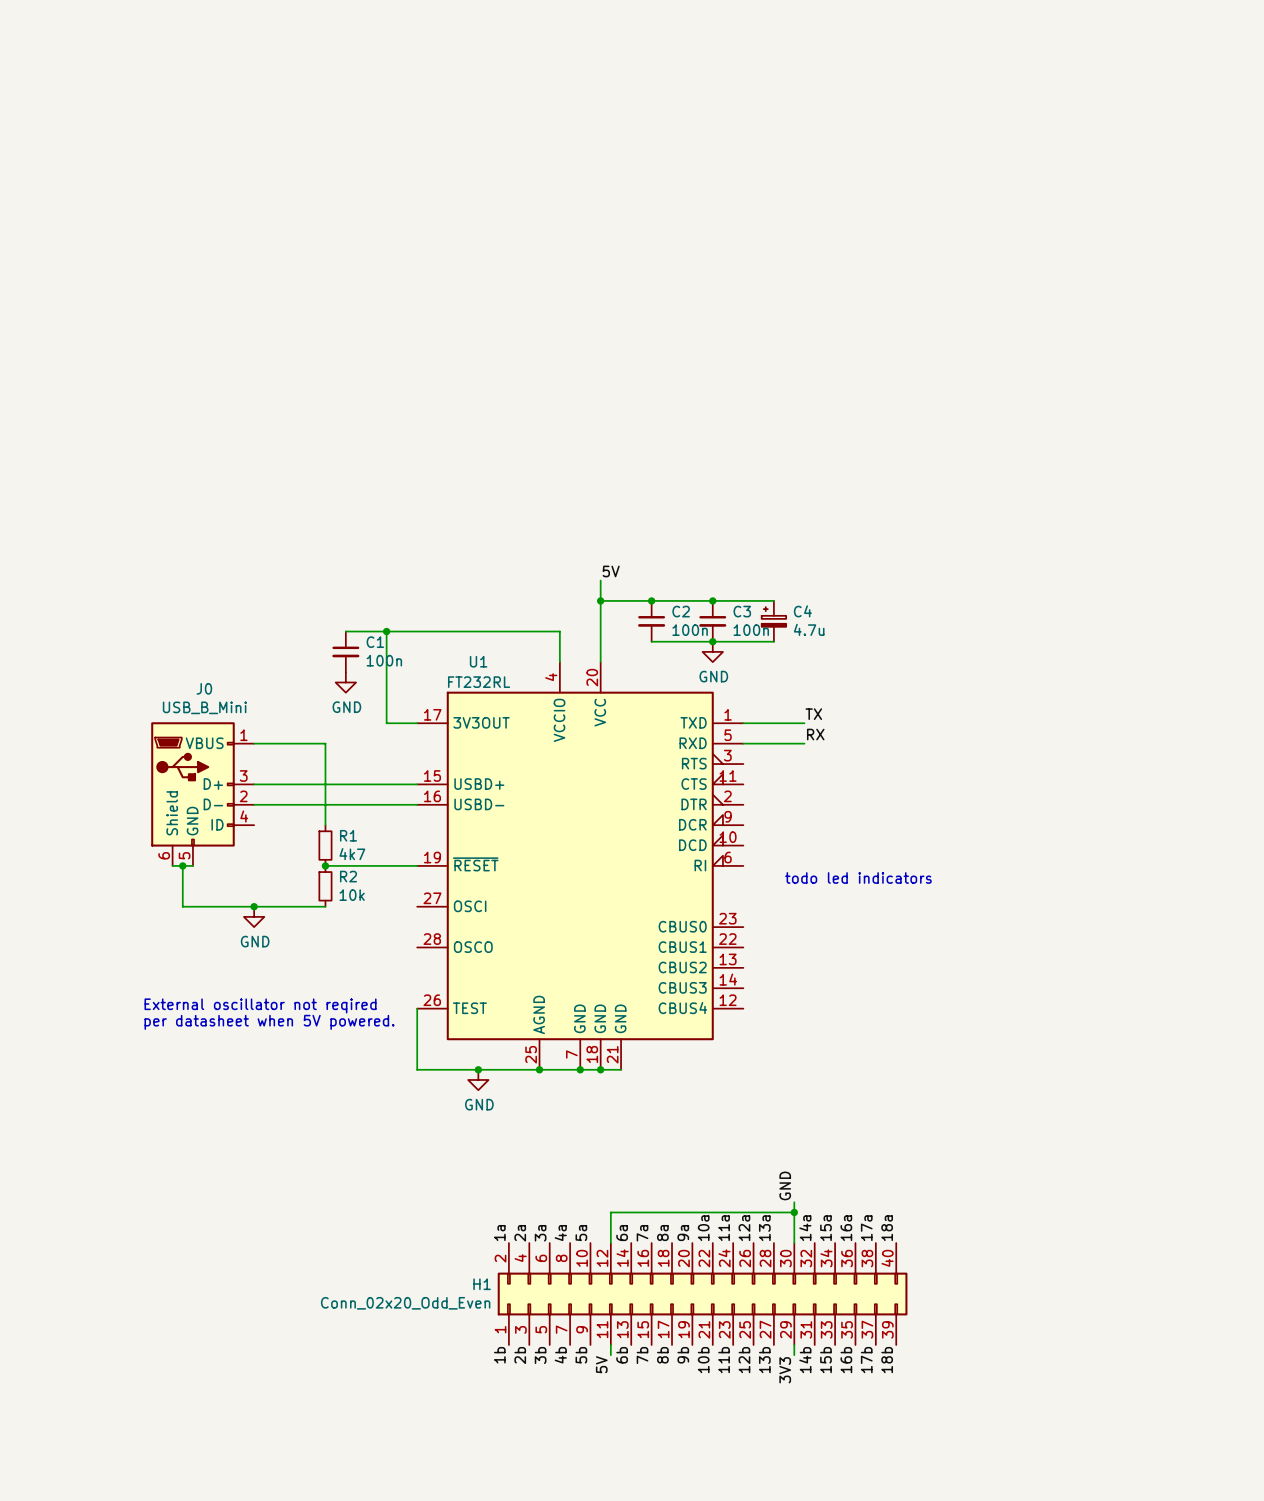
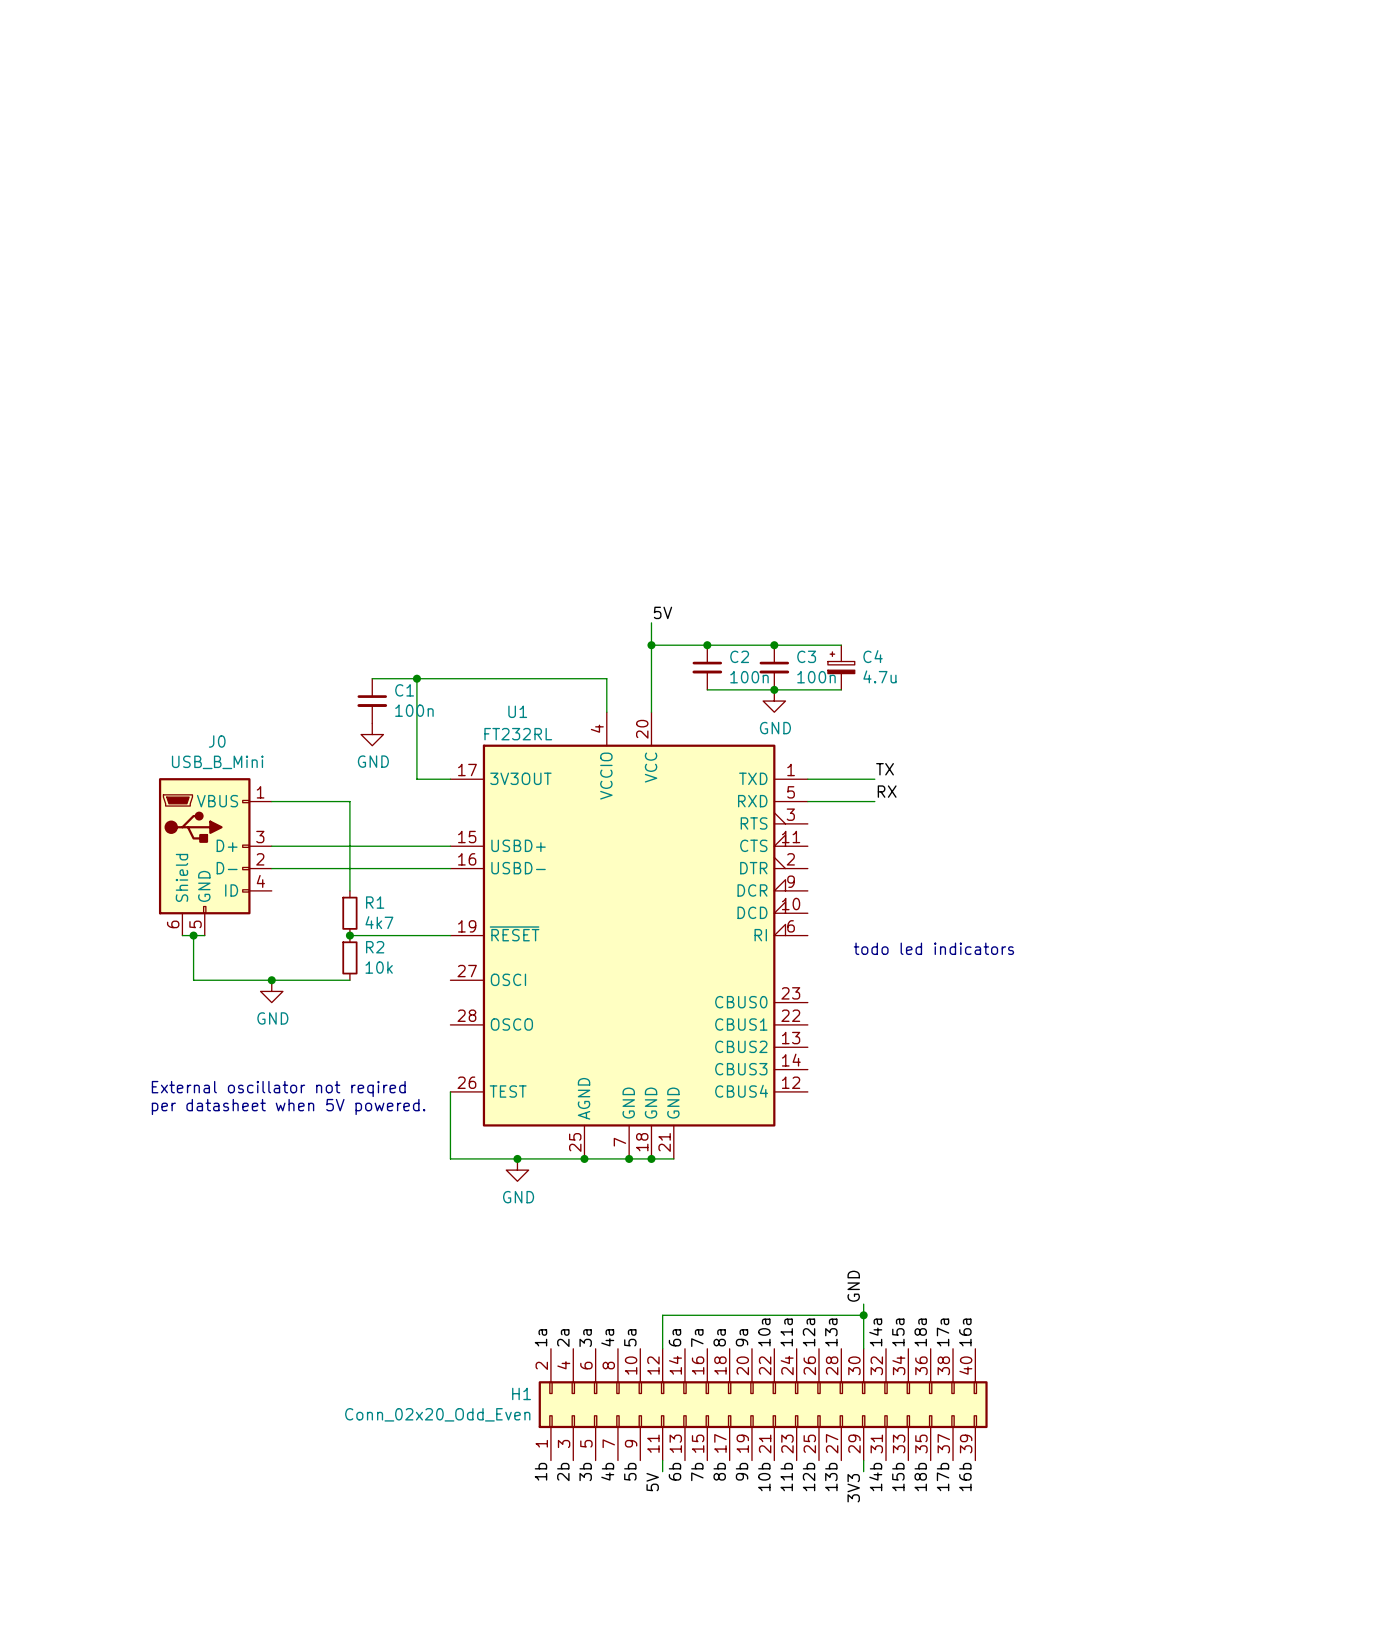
label: 16a (846, 1228) -> 18a (920, 1332)
label: 18a (887, 1228) -> 16a (965, 1332)
label: 16b (846, 1360) -> 18b (920, 1477)
label: 18b (887, 1360) -> 16b (965, 1477)

